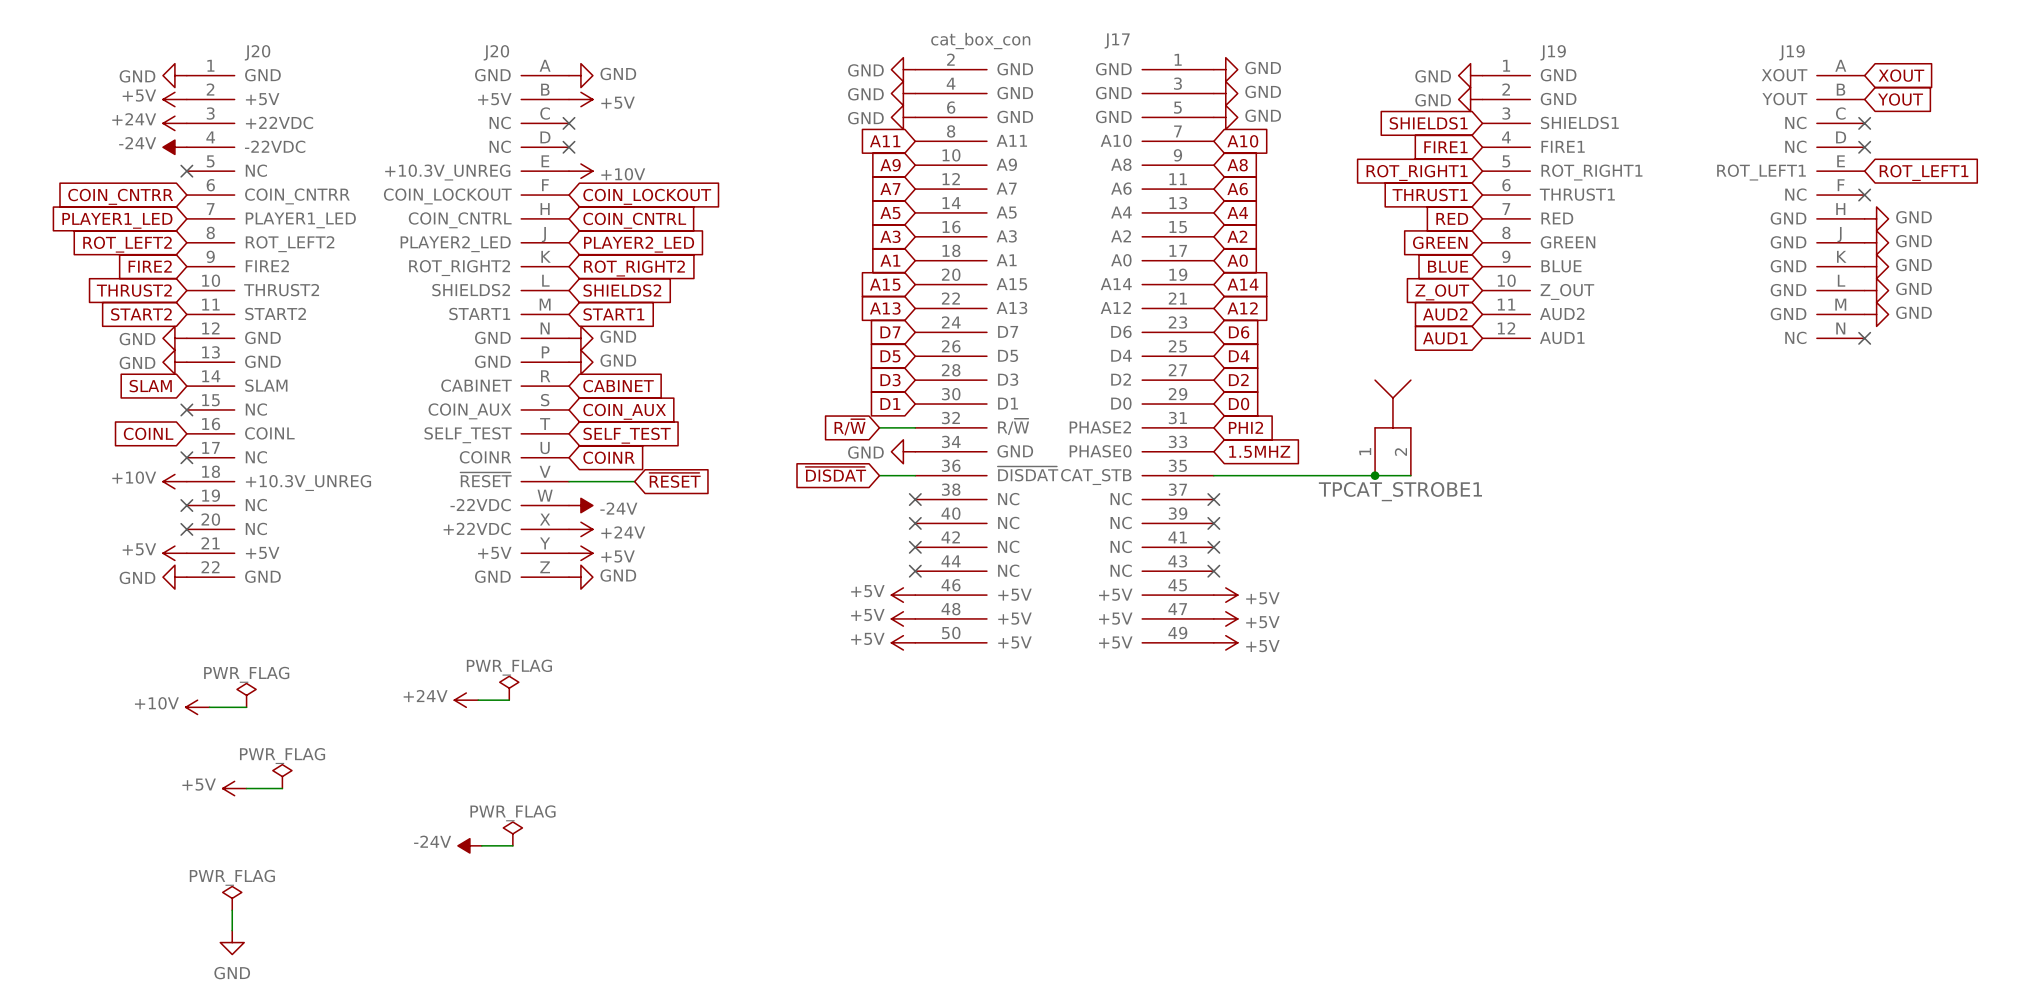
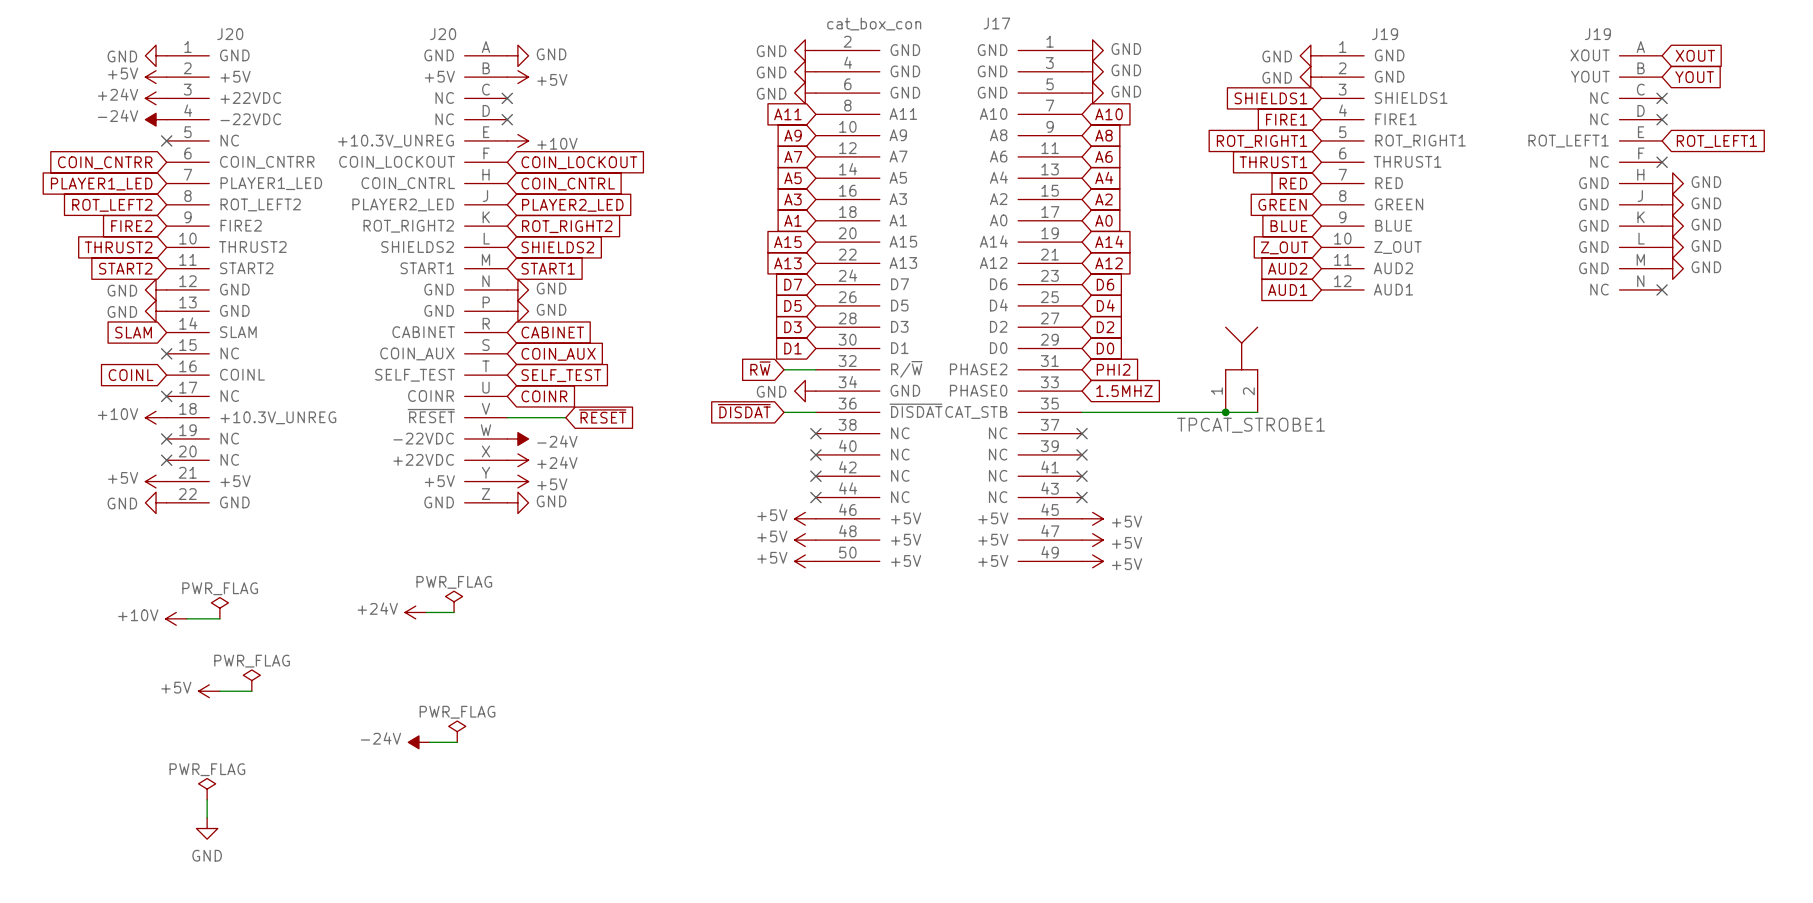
global label: R/~{W} (850, 427) -> R~{W} (760, 368)

